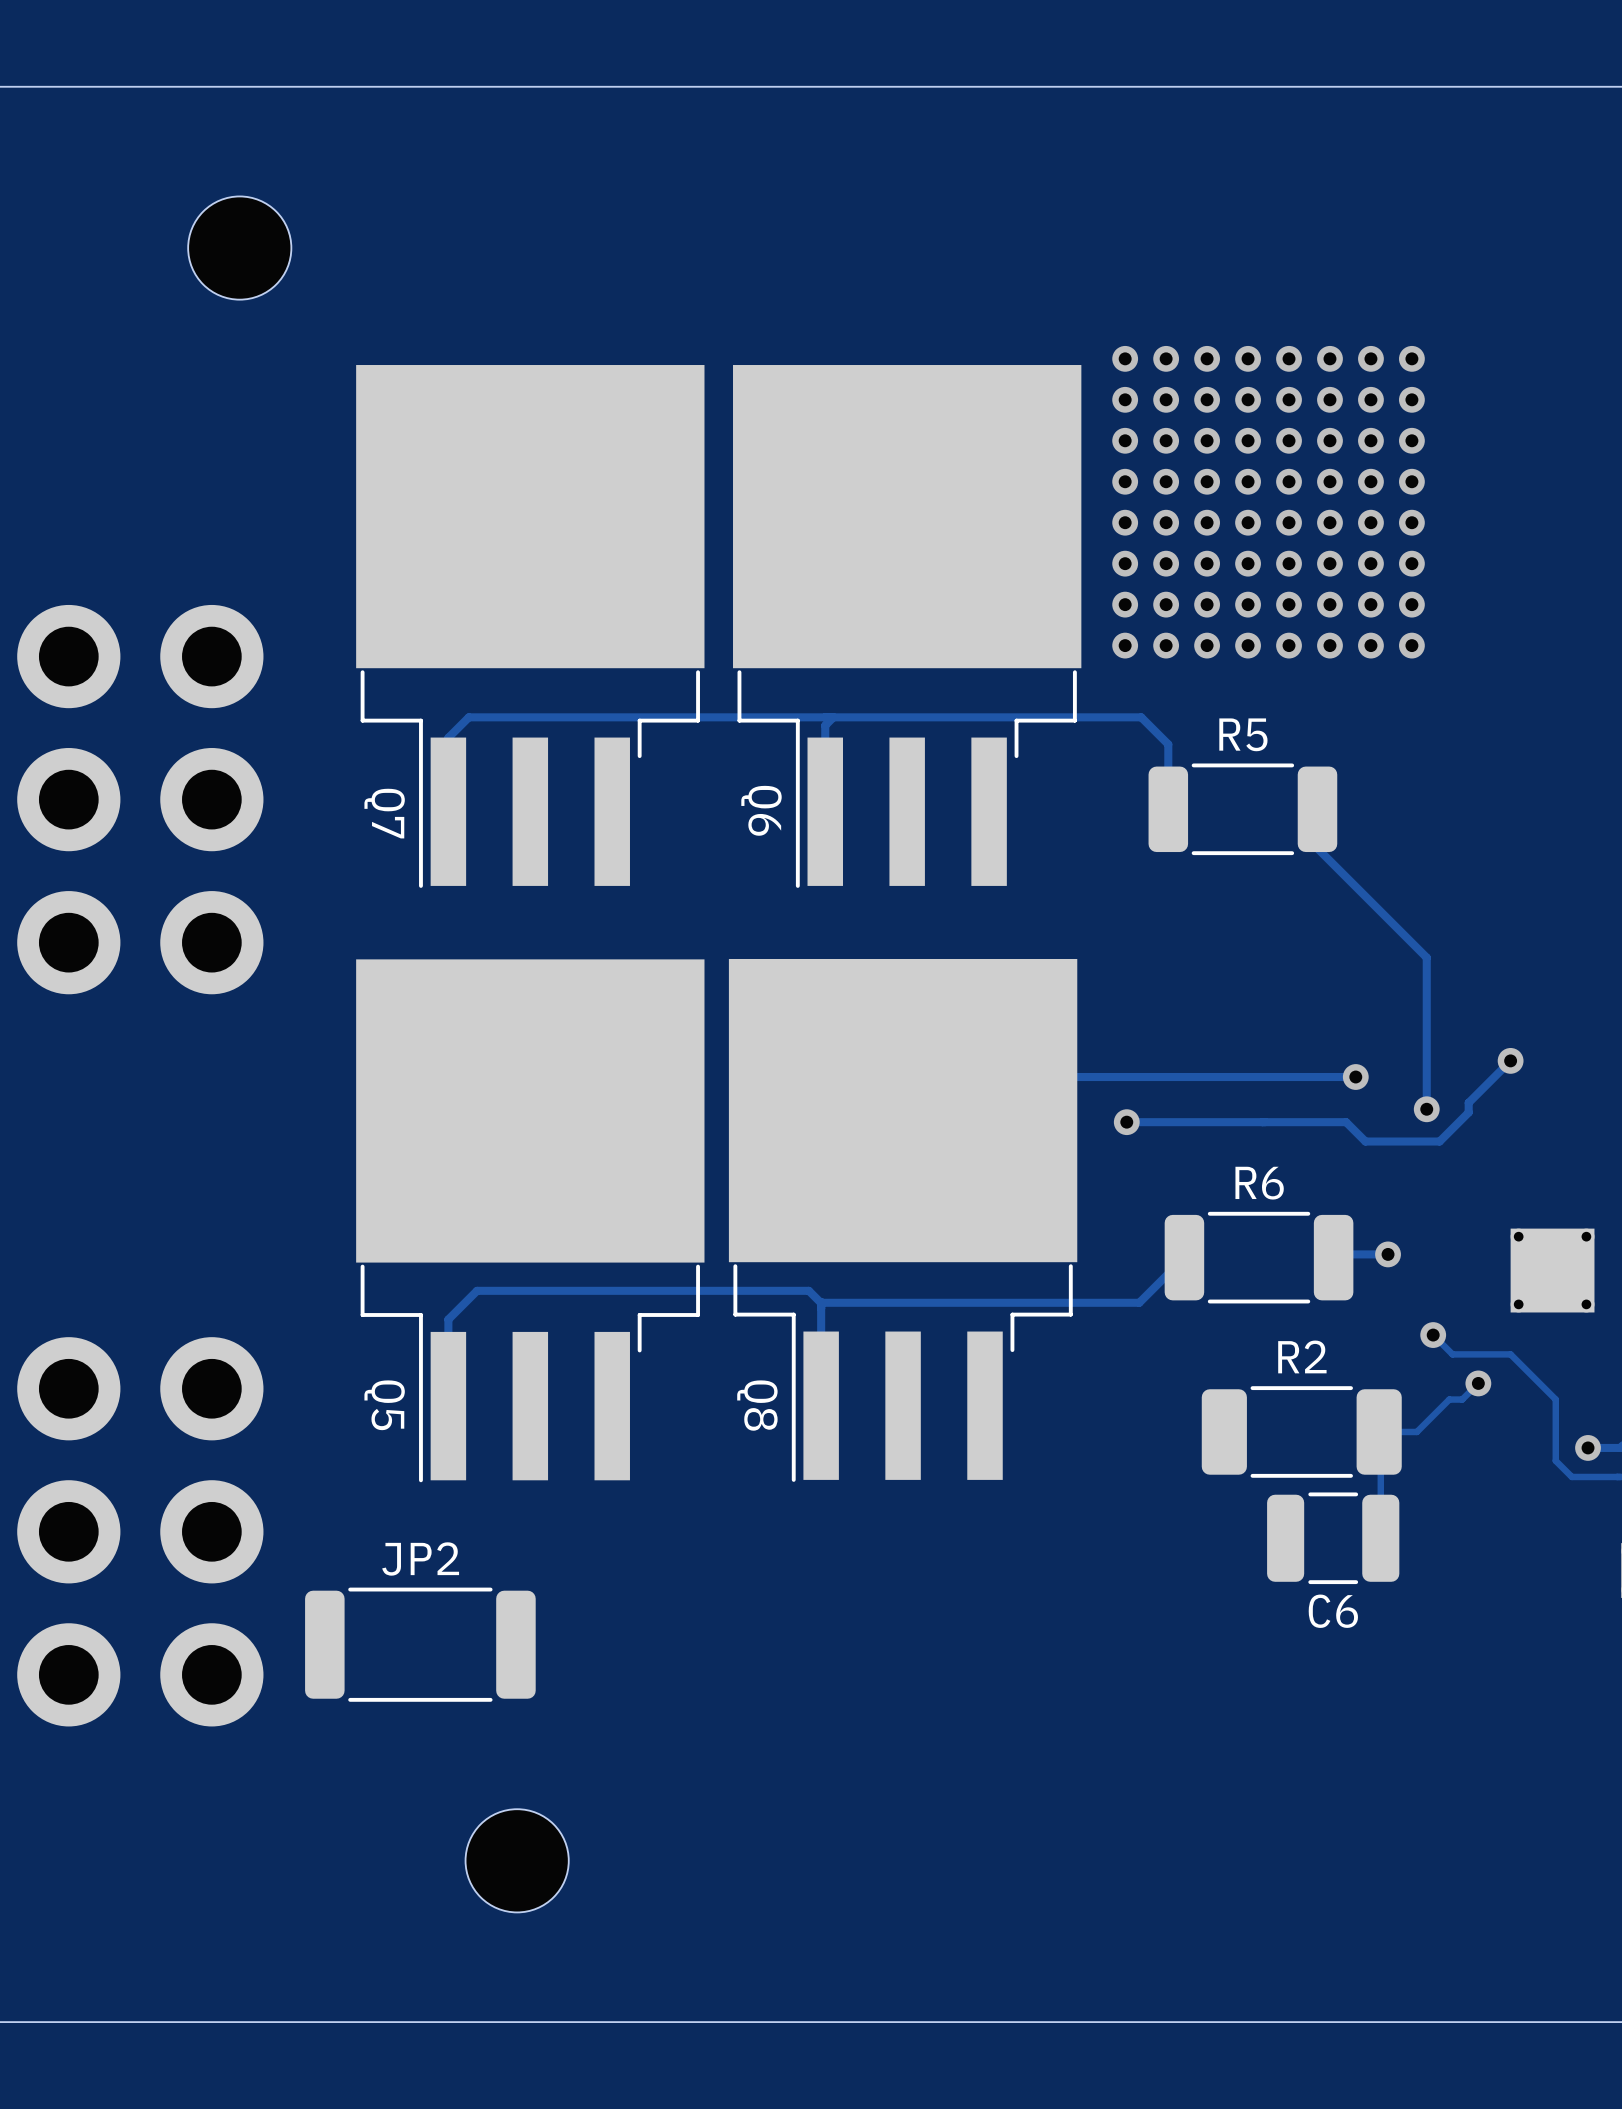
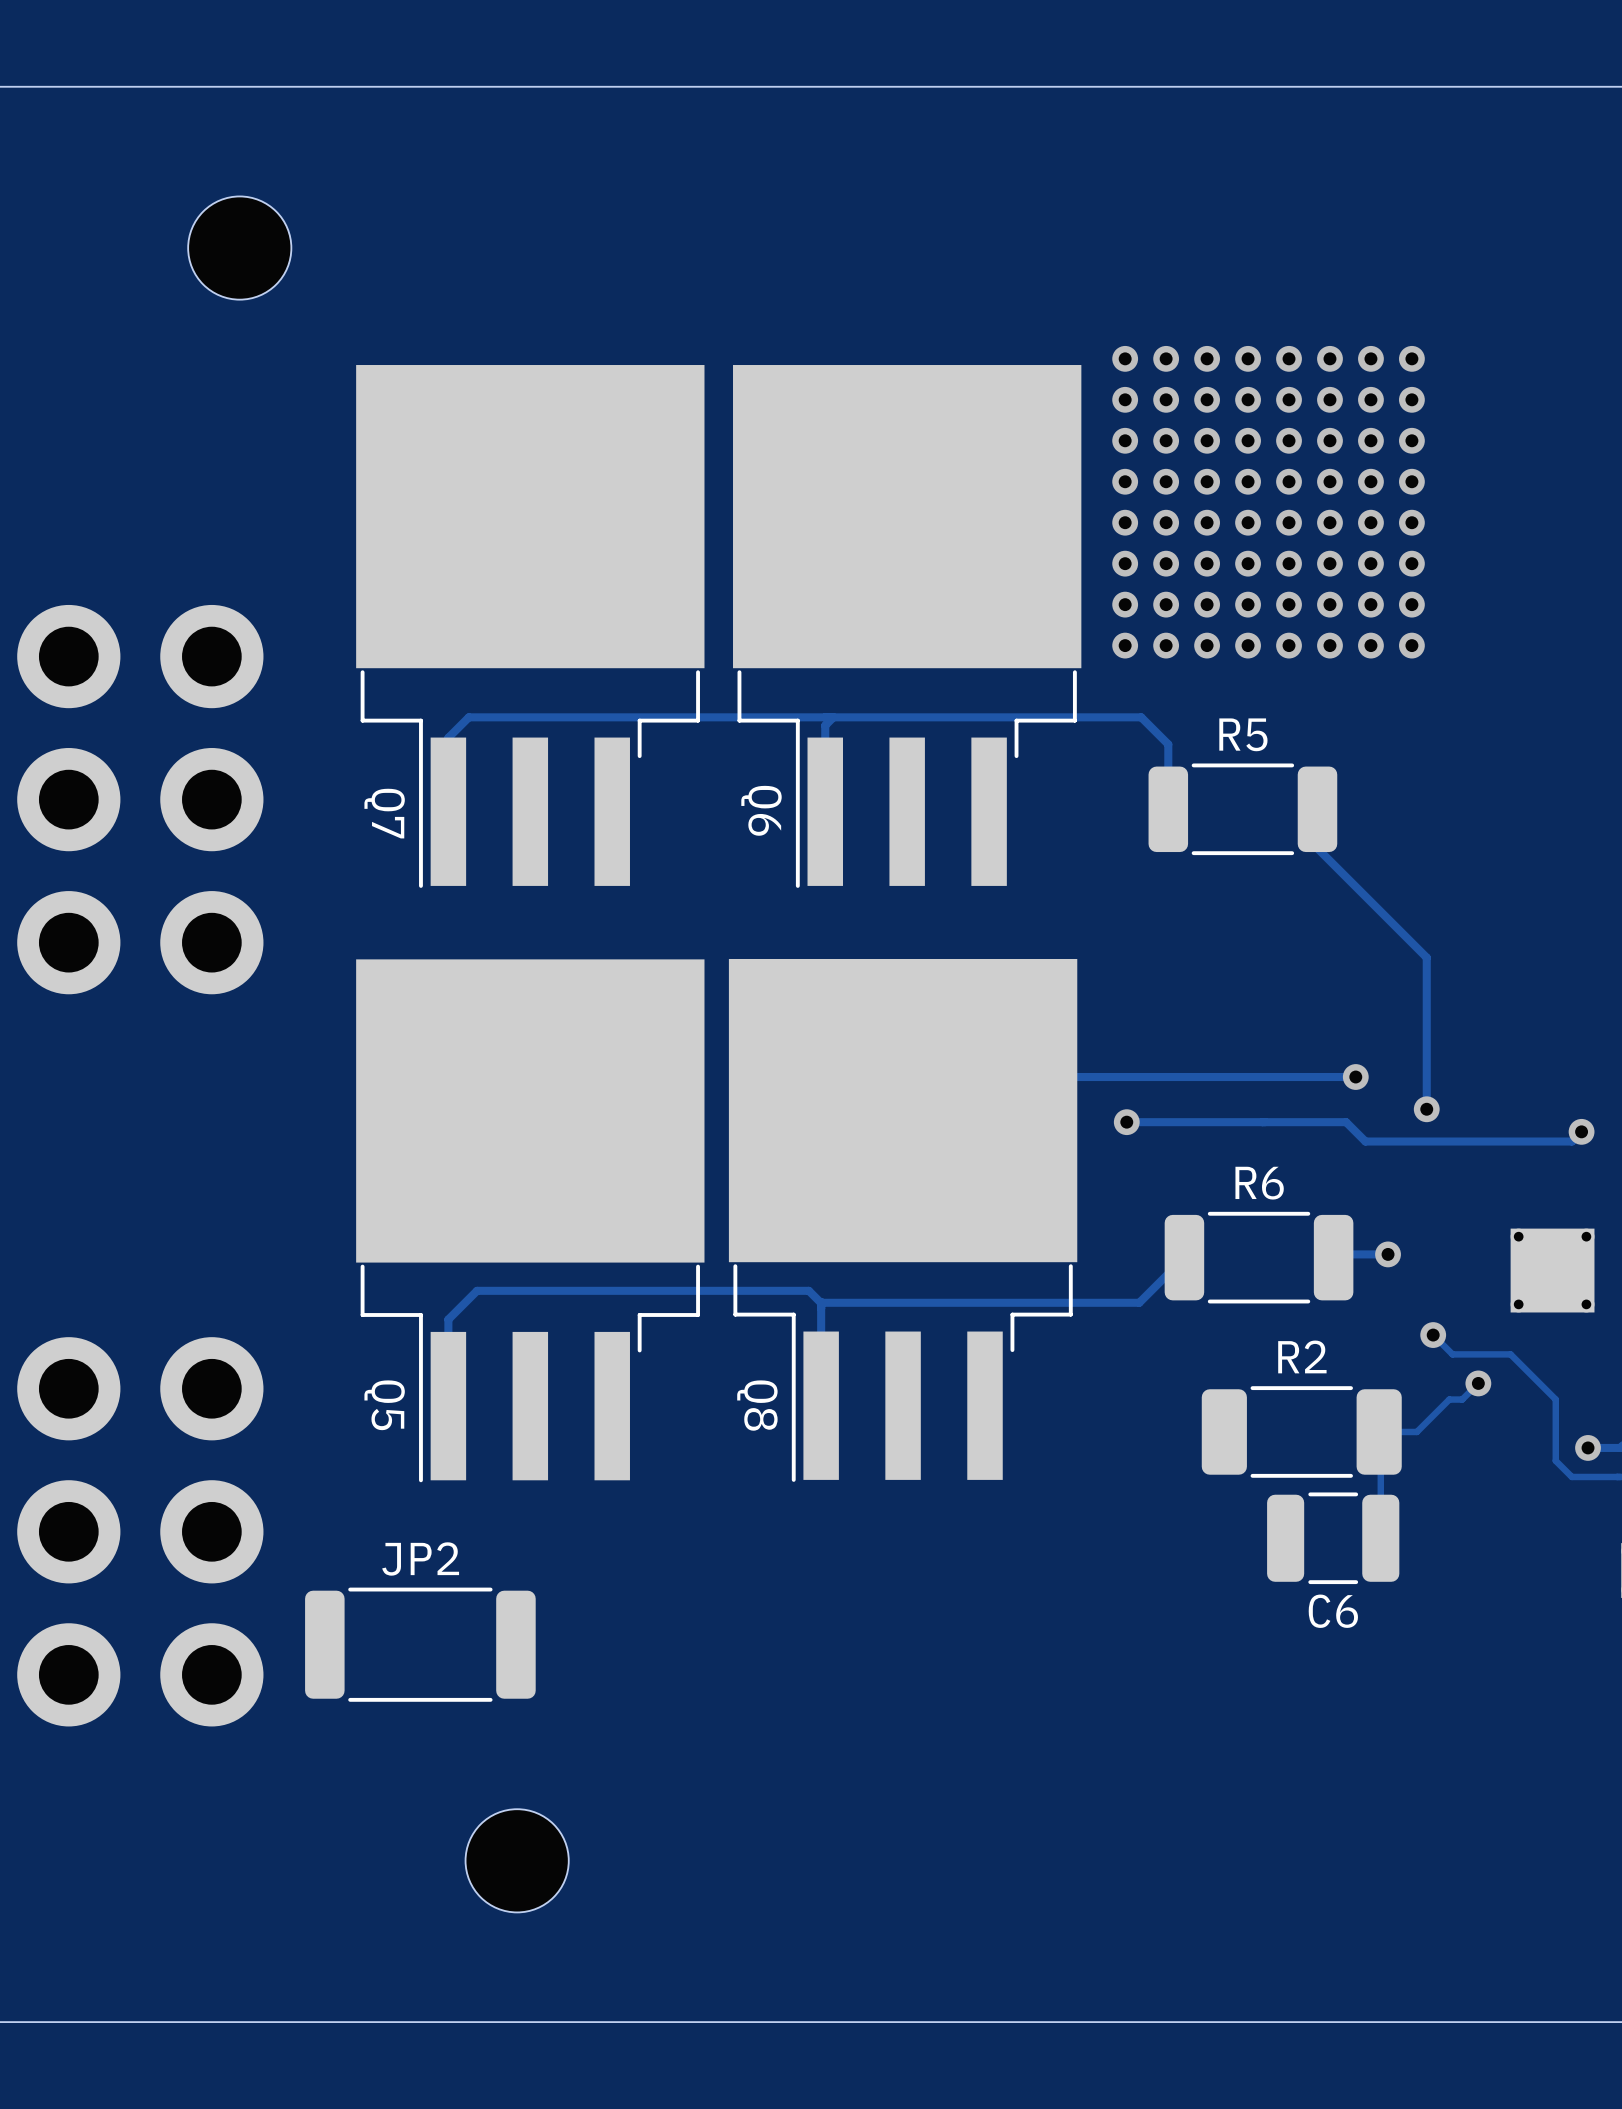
track: (1510, 1060) (1468, 1102) (1468, 1112) (1439, 1141) -> (1581, 1131) (1571, 1141) (1439, 1141)
via: (1510, 1060) -> none
via: none -> (1581, 1131)

